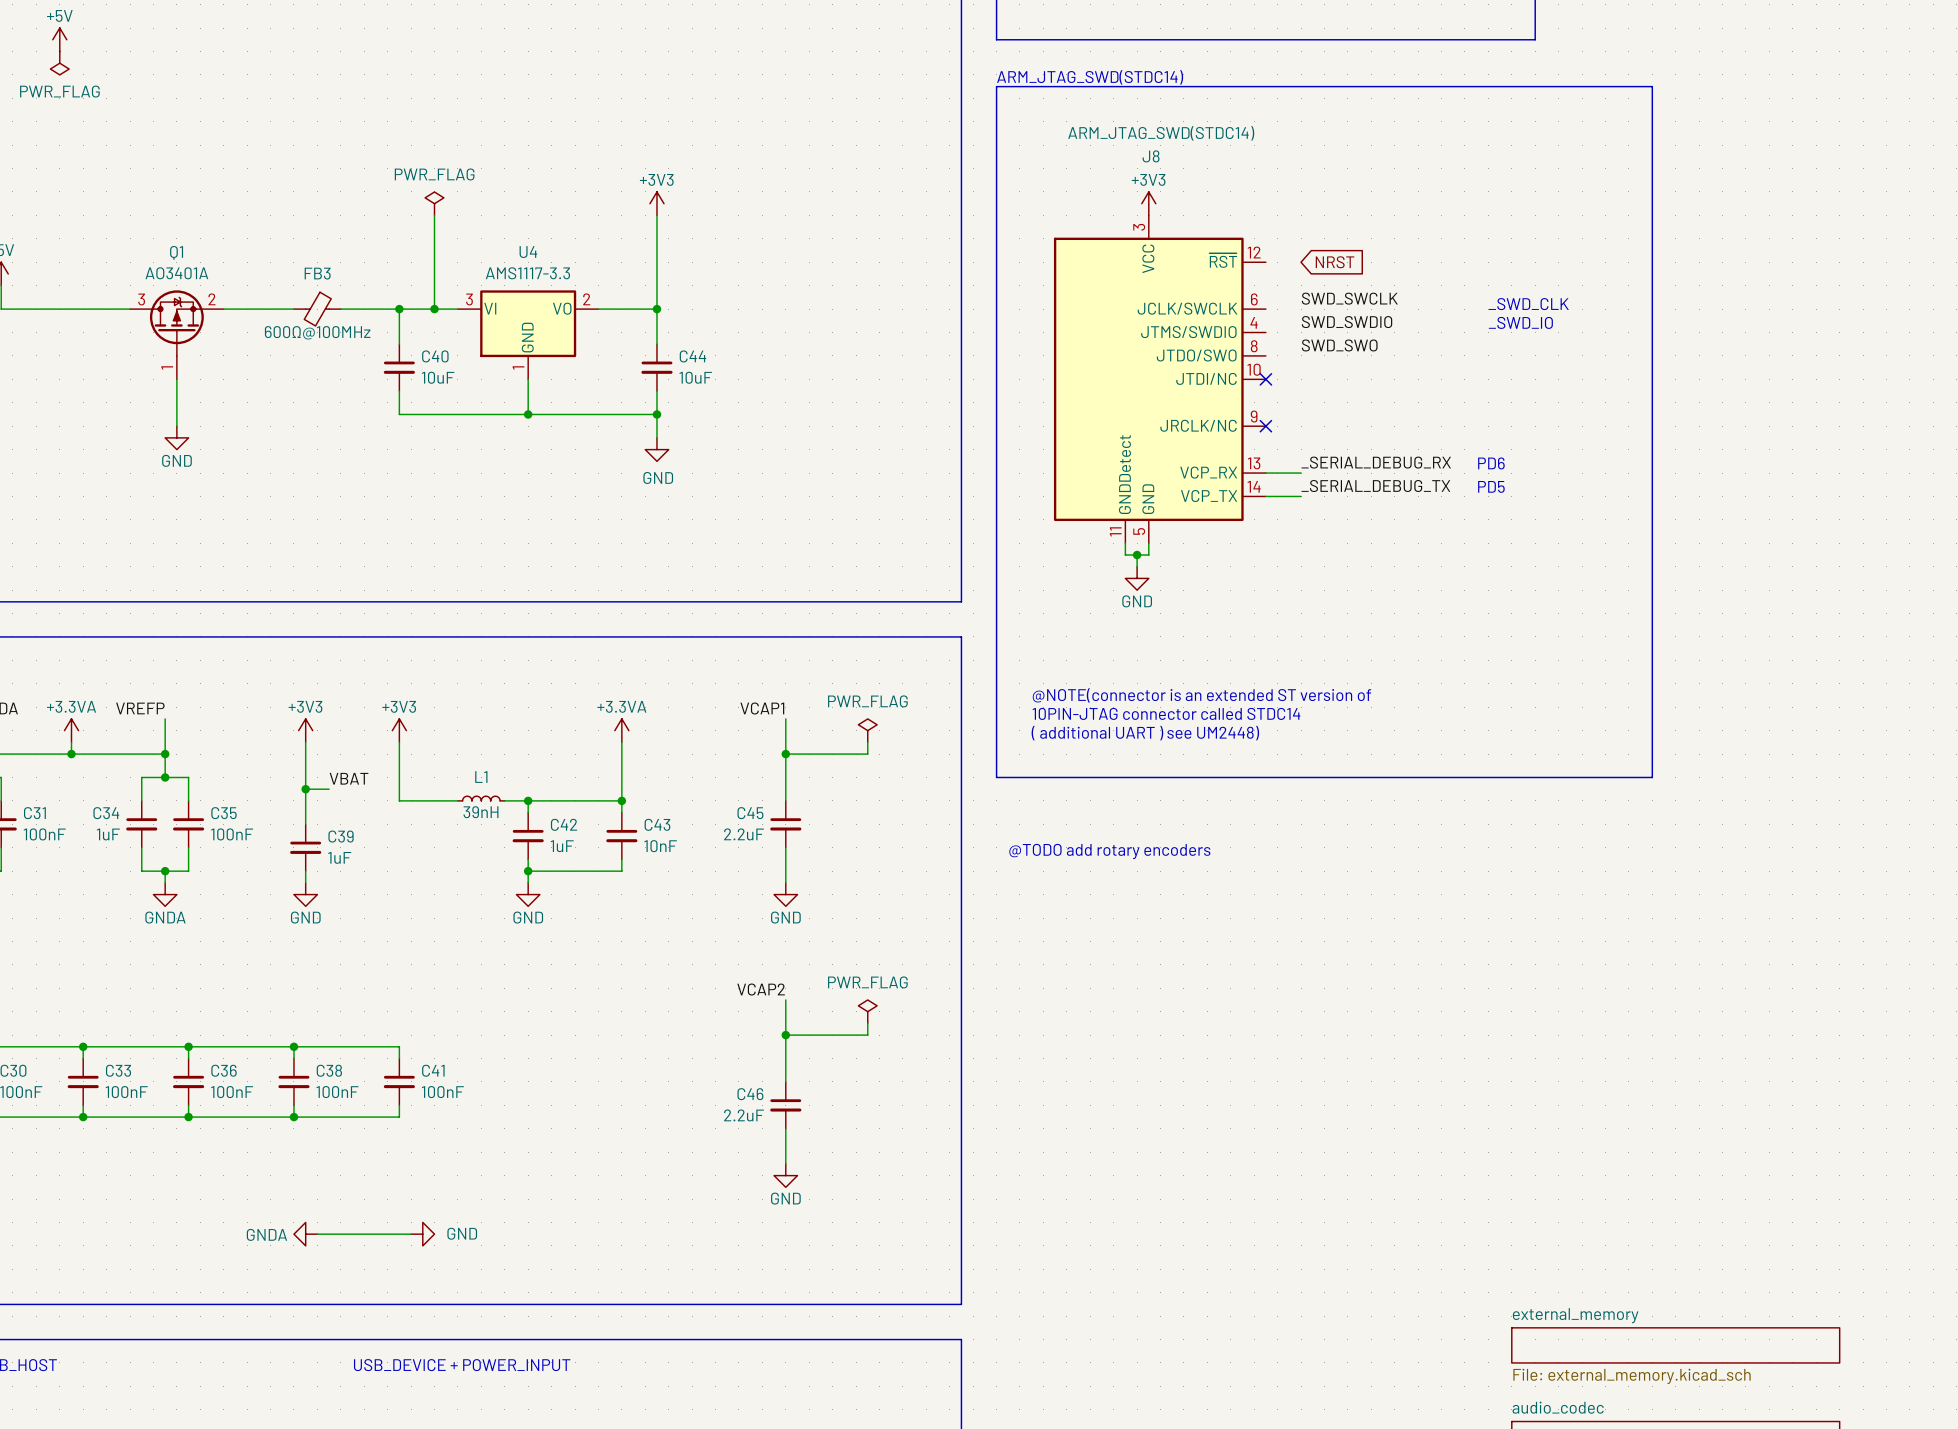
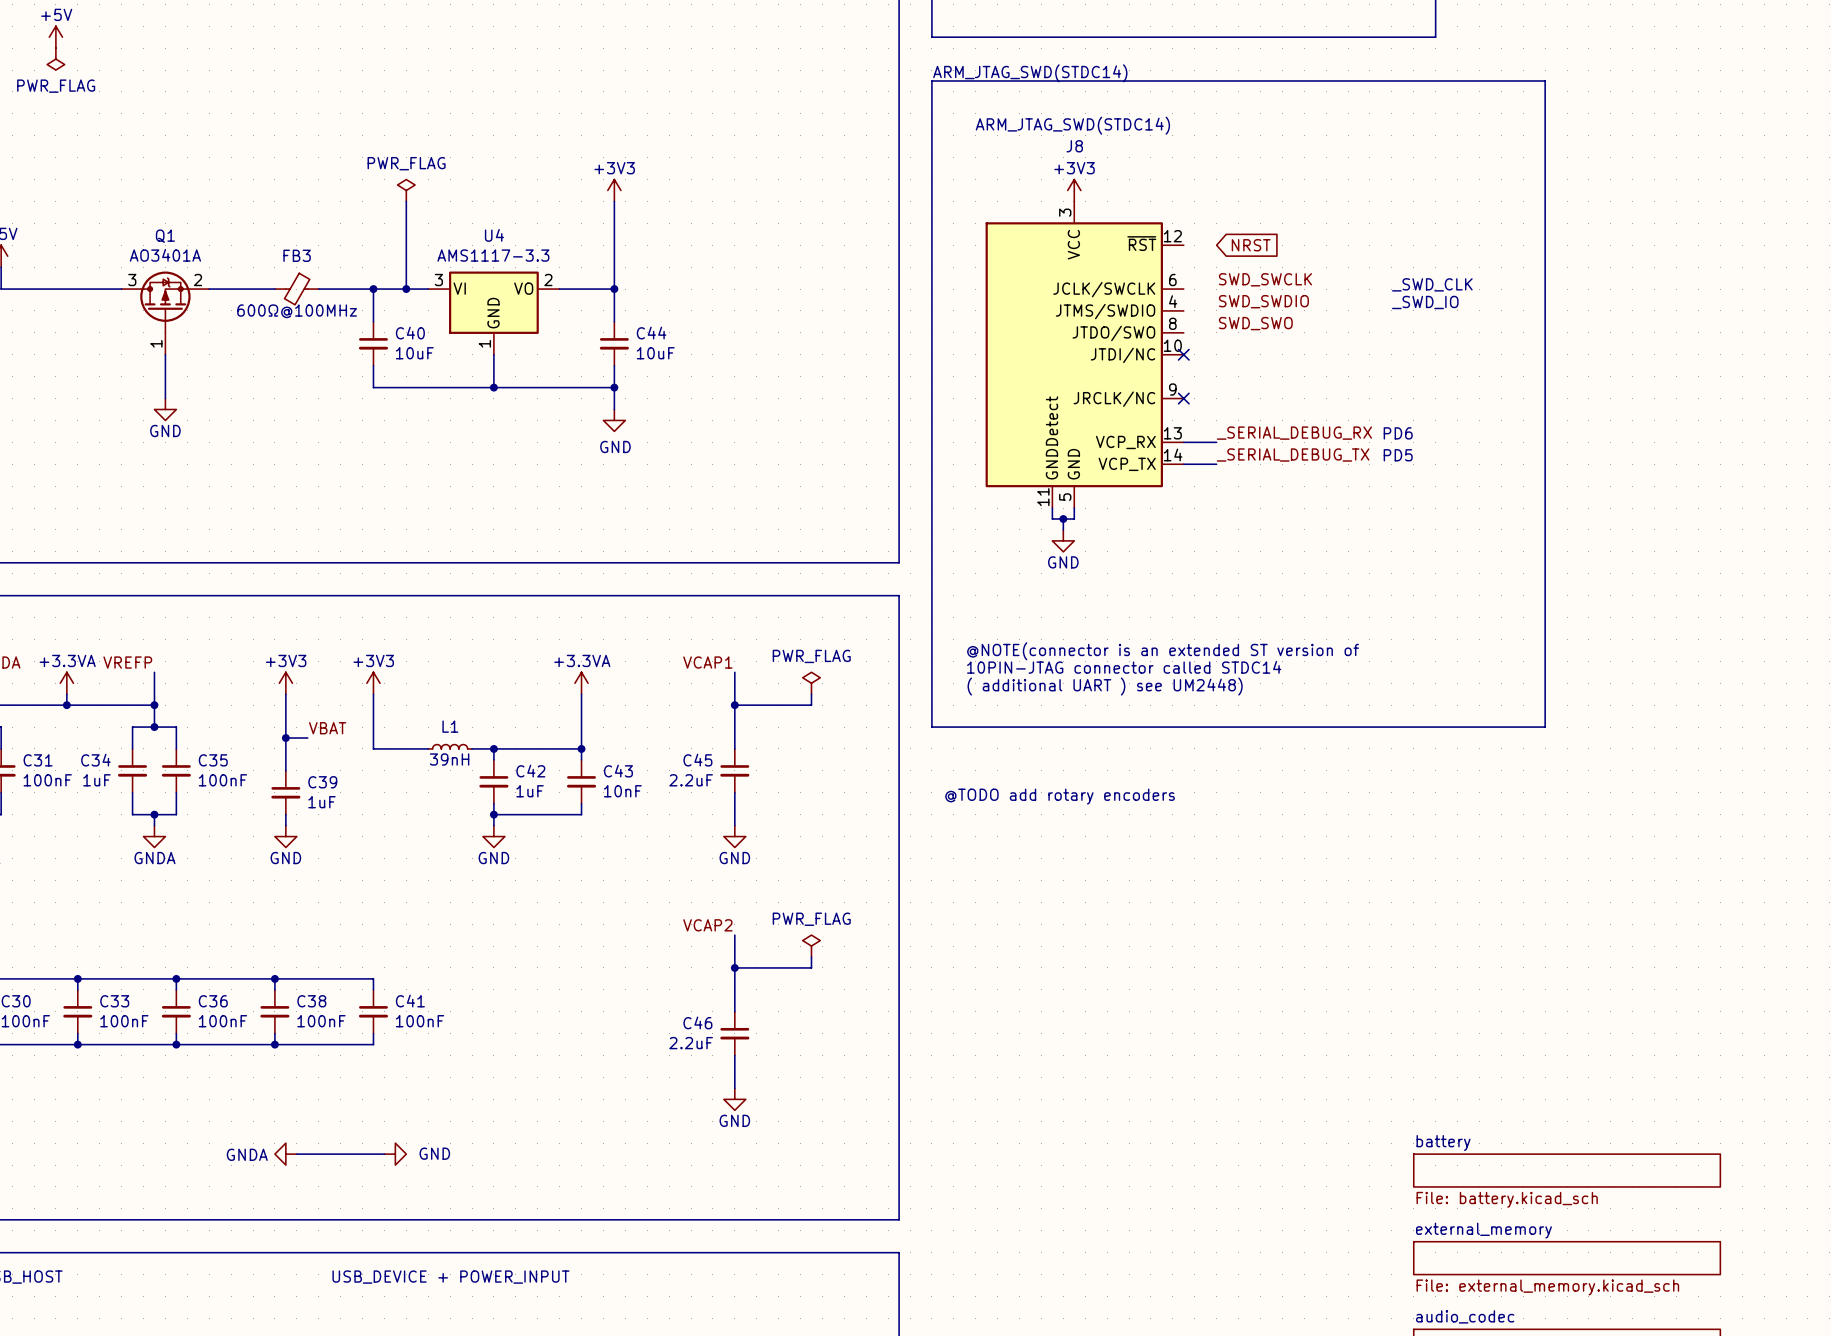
sheet battery: none -> File: battery.kicad_sch (1567, 1170)

